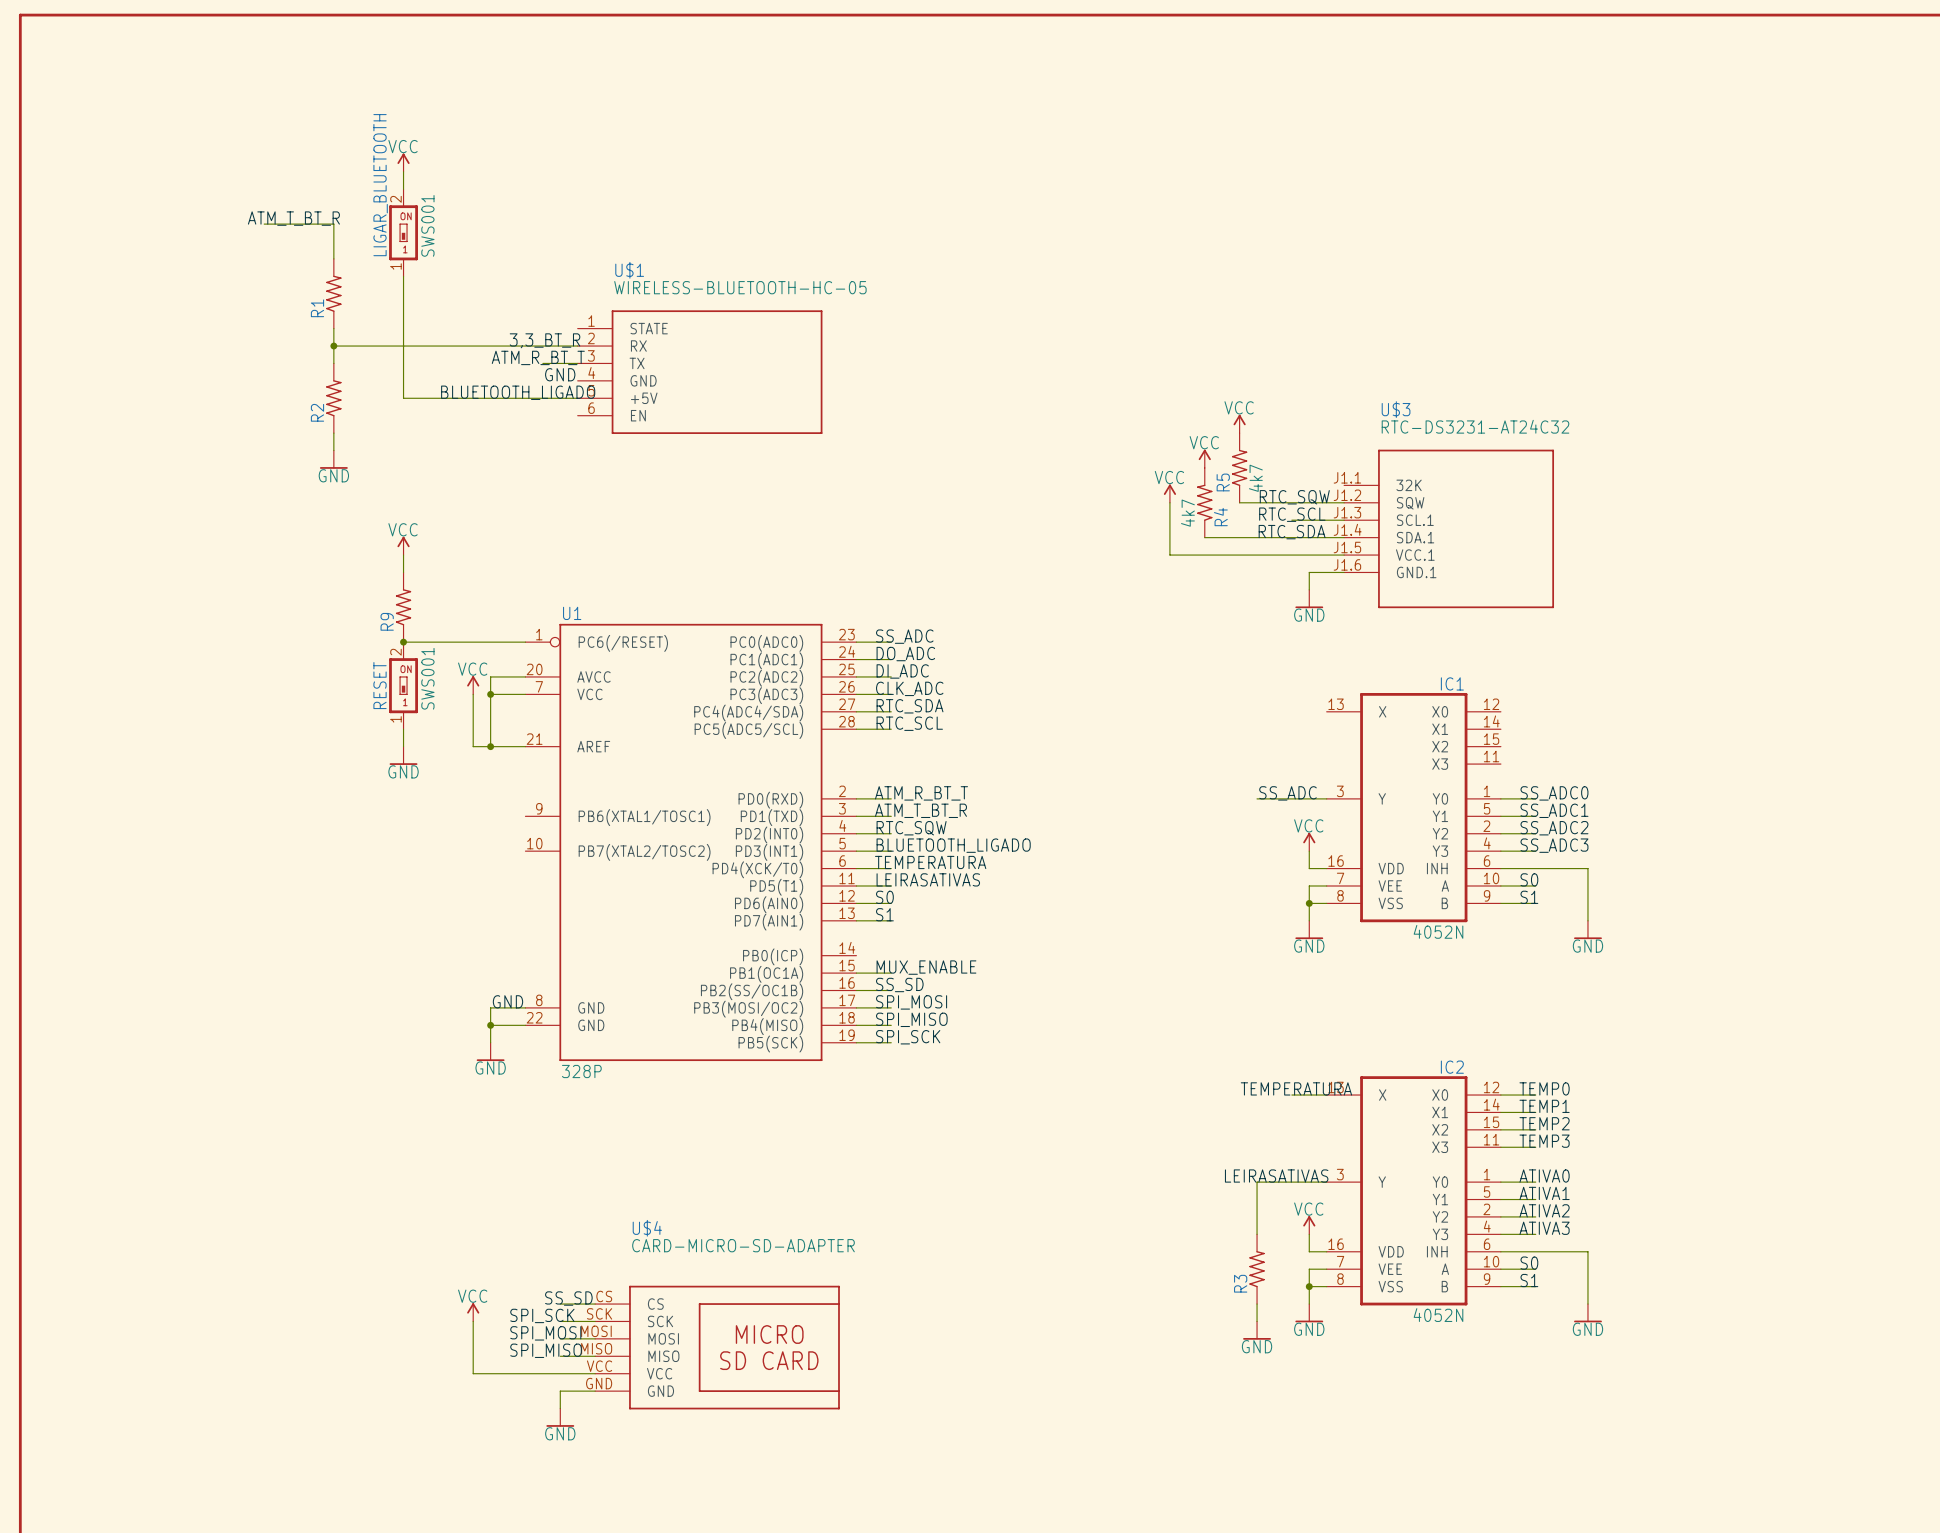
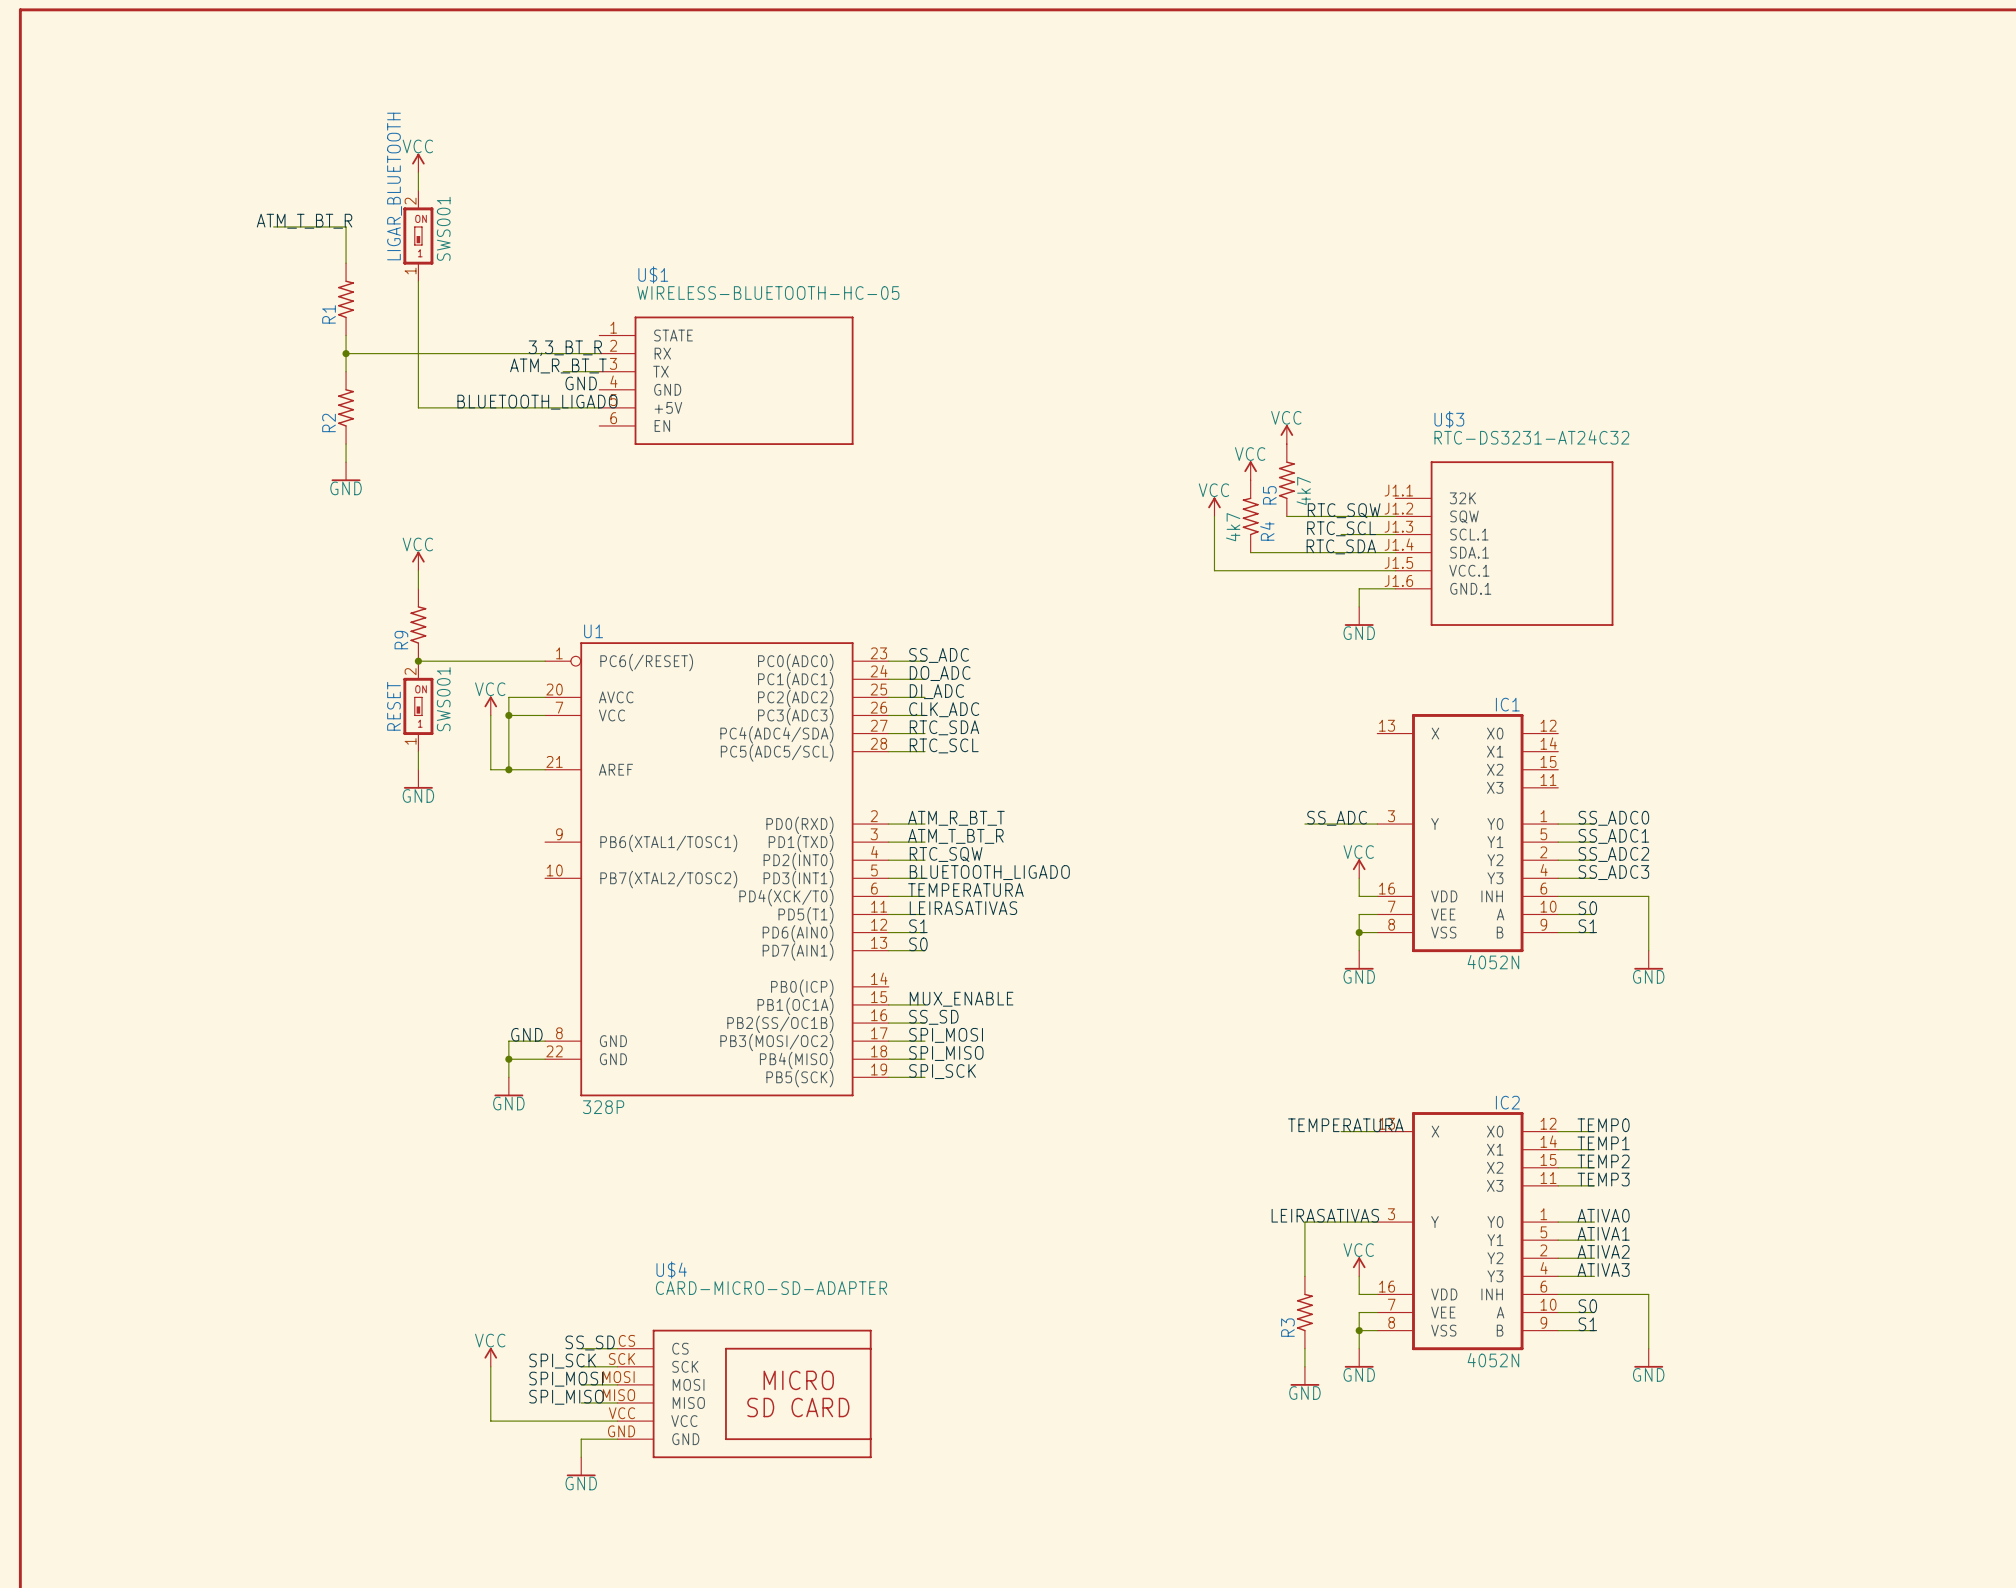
label: S0 (884, 897) -> S1 (918, 926)
label: S1 (884, 914) -> S0 (918, 944)

